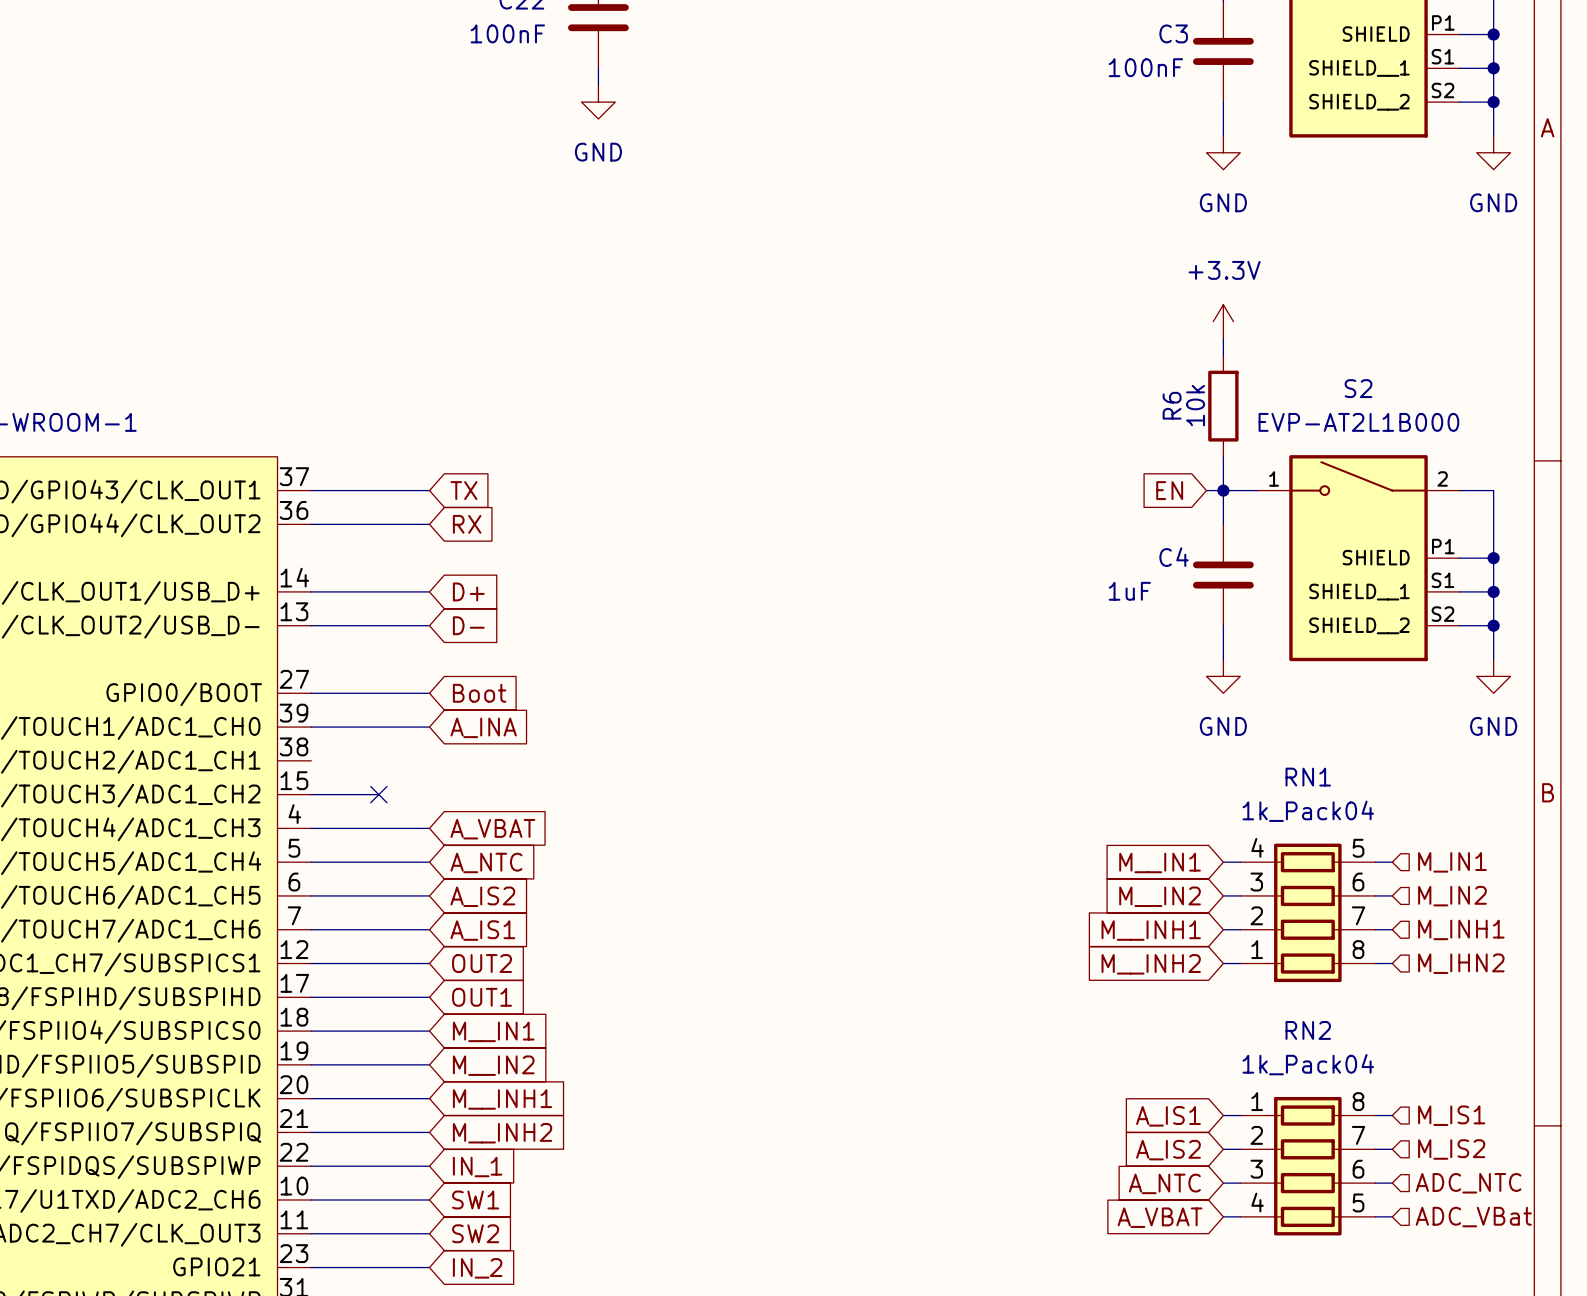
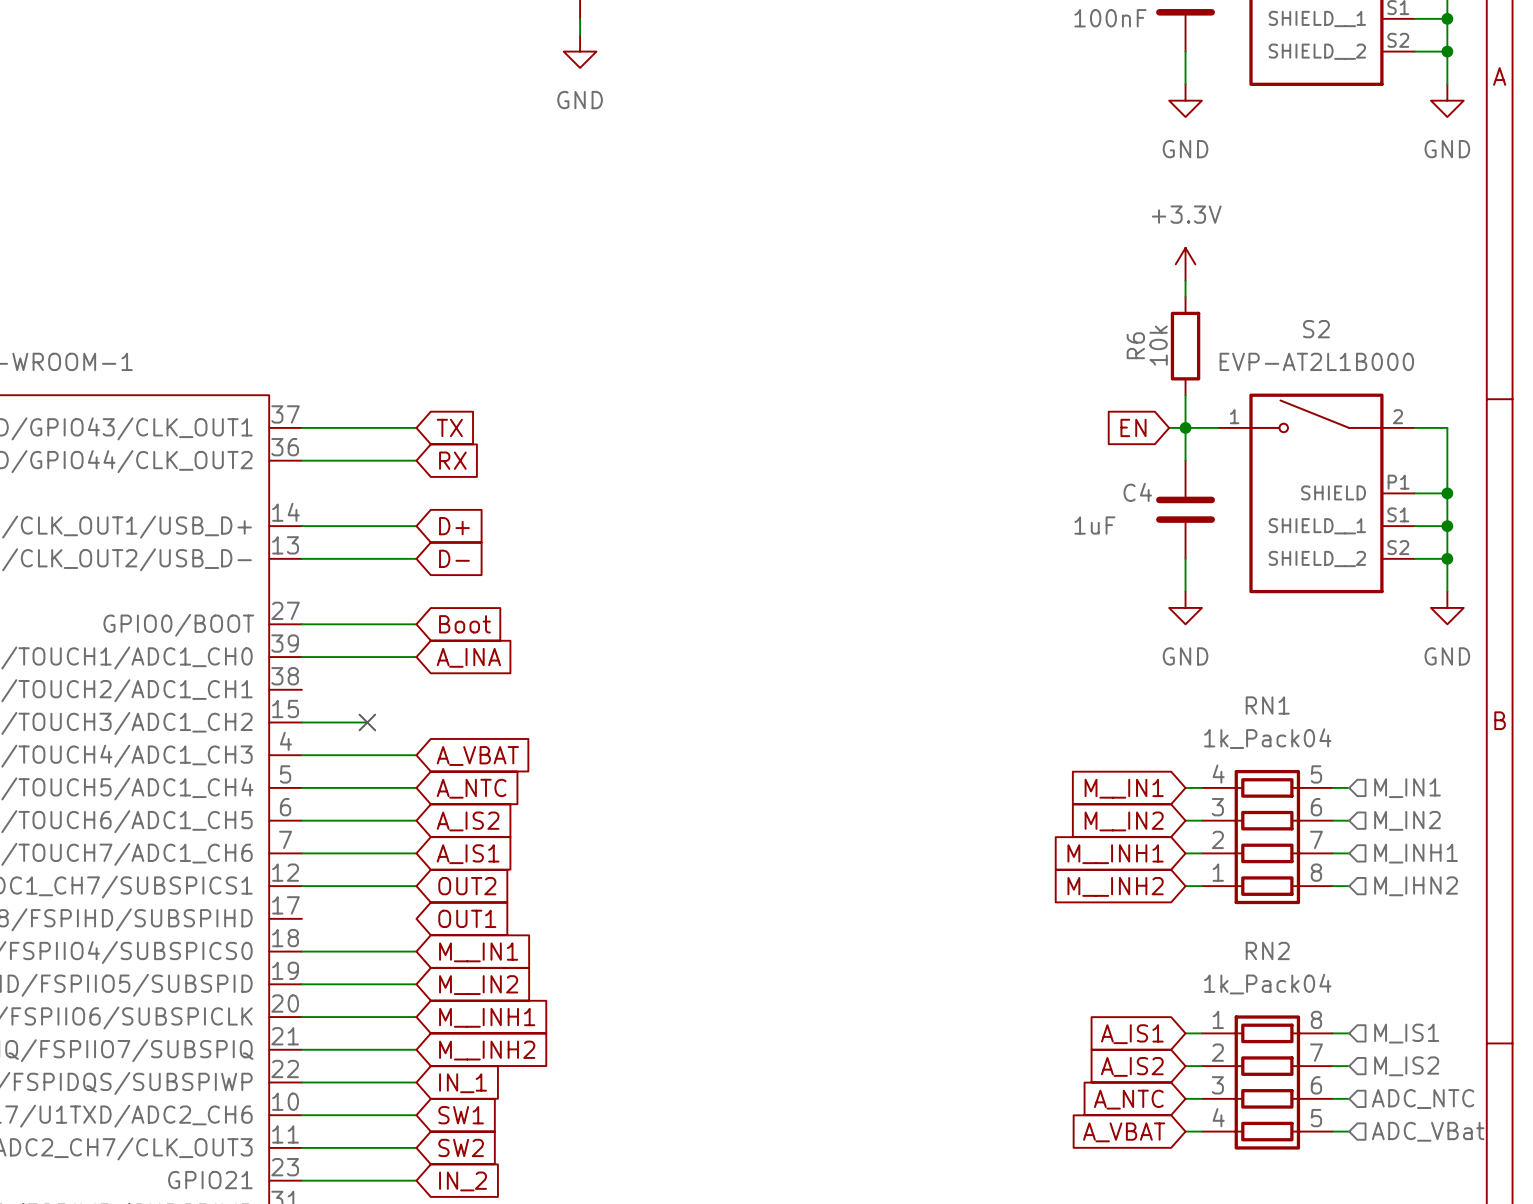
wire: (311, 997) (429, 997) -> none

